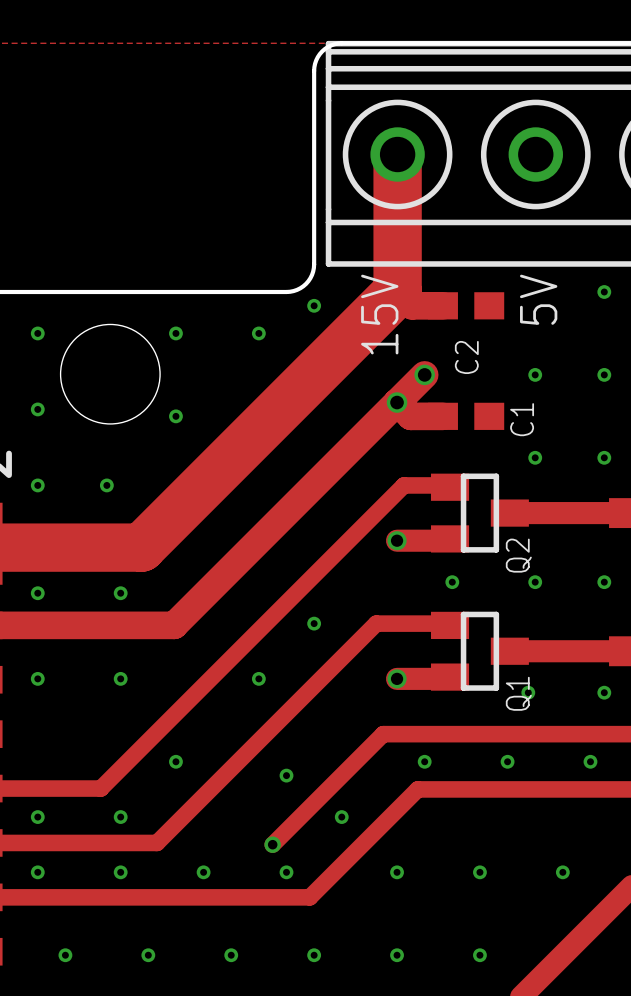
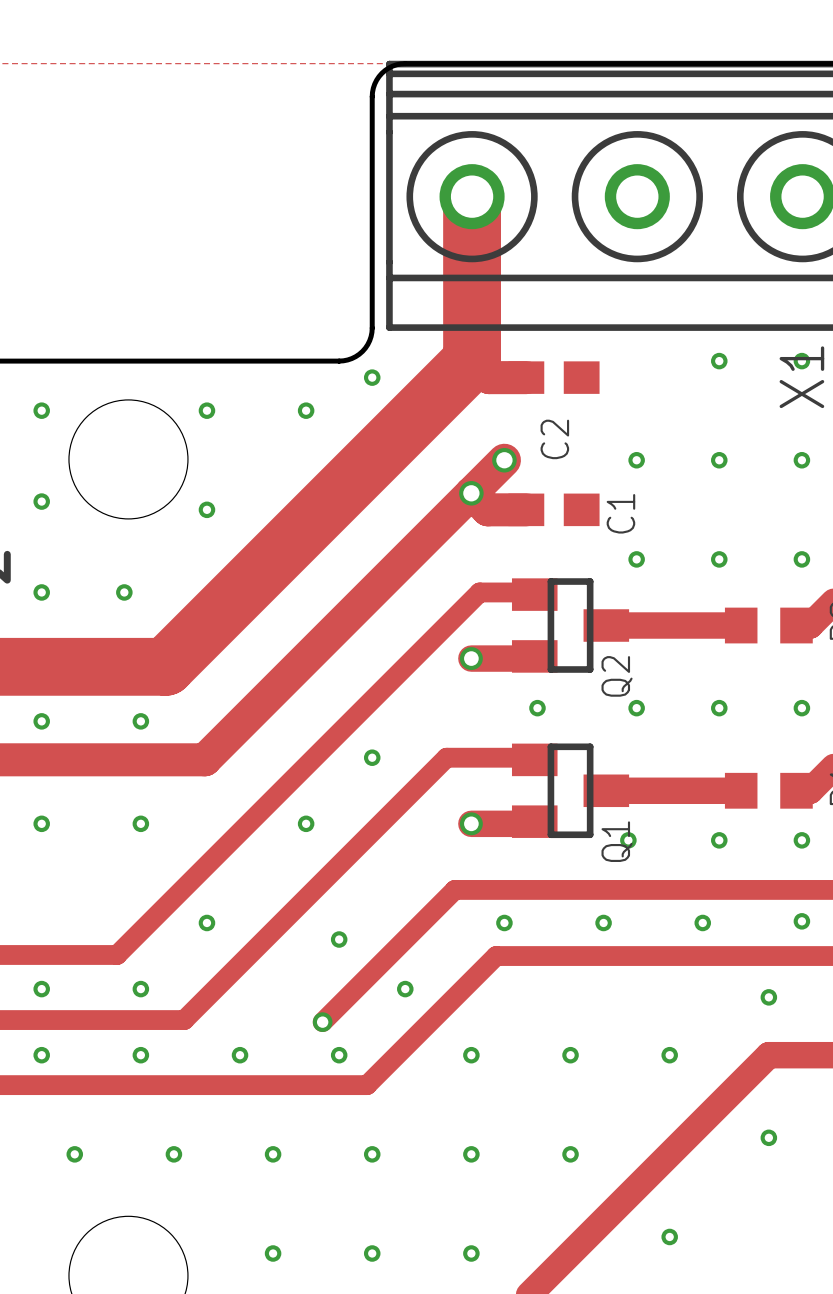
text: 5V (538, 299) -> none
text: 15V (379, 314) -> none

